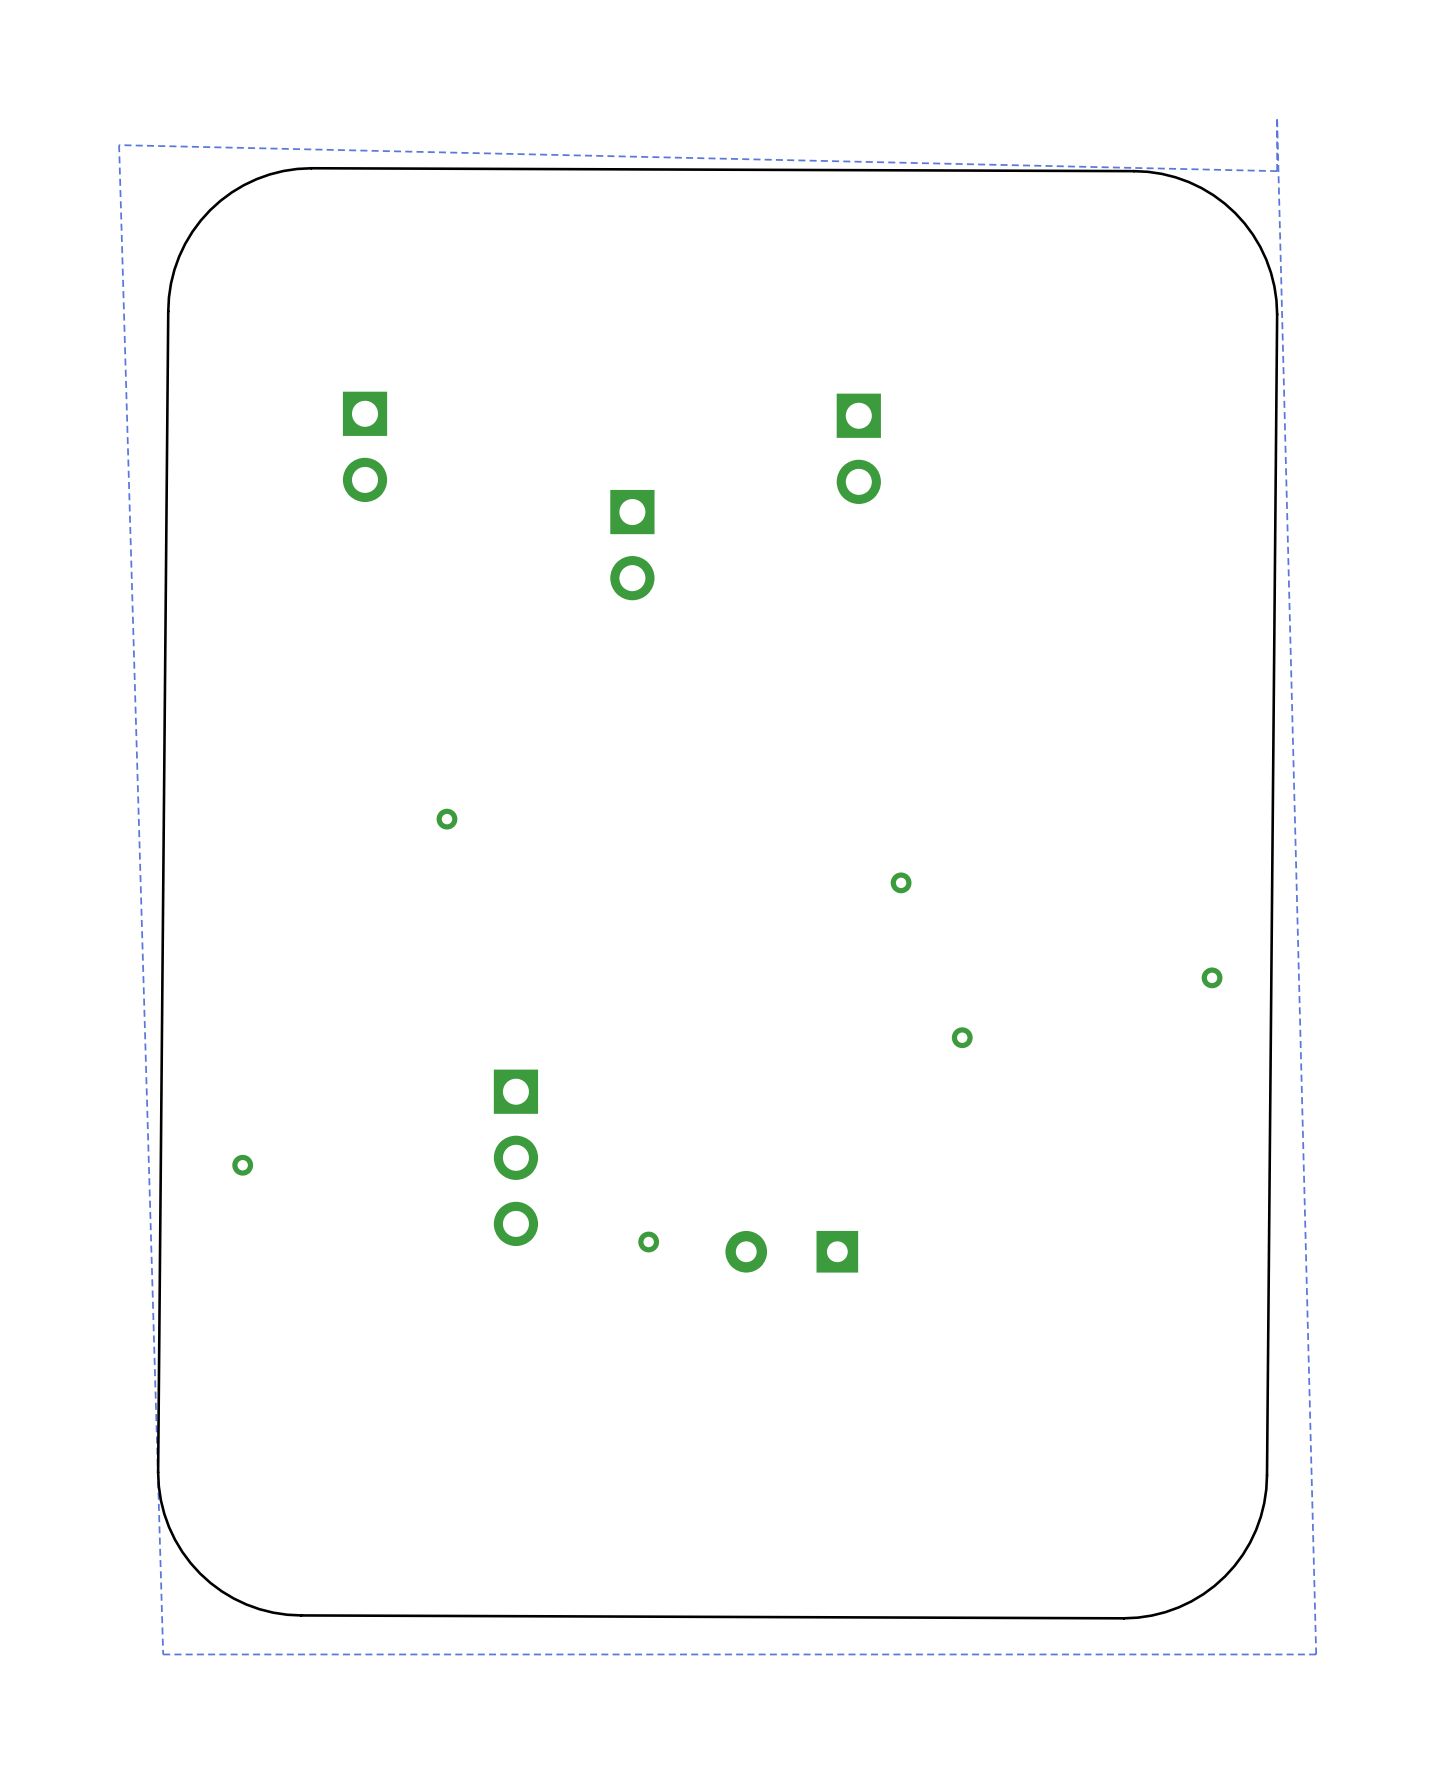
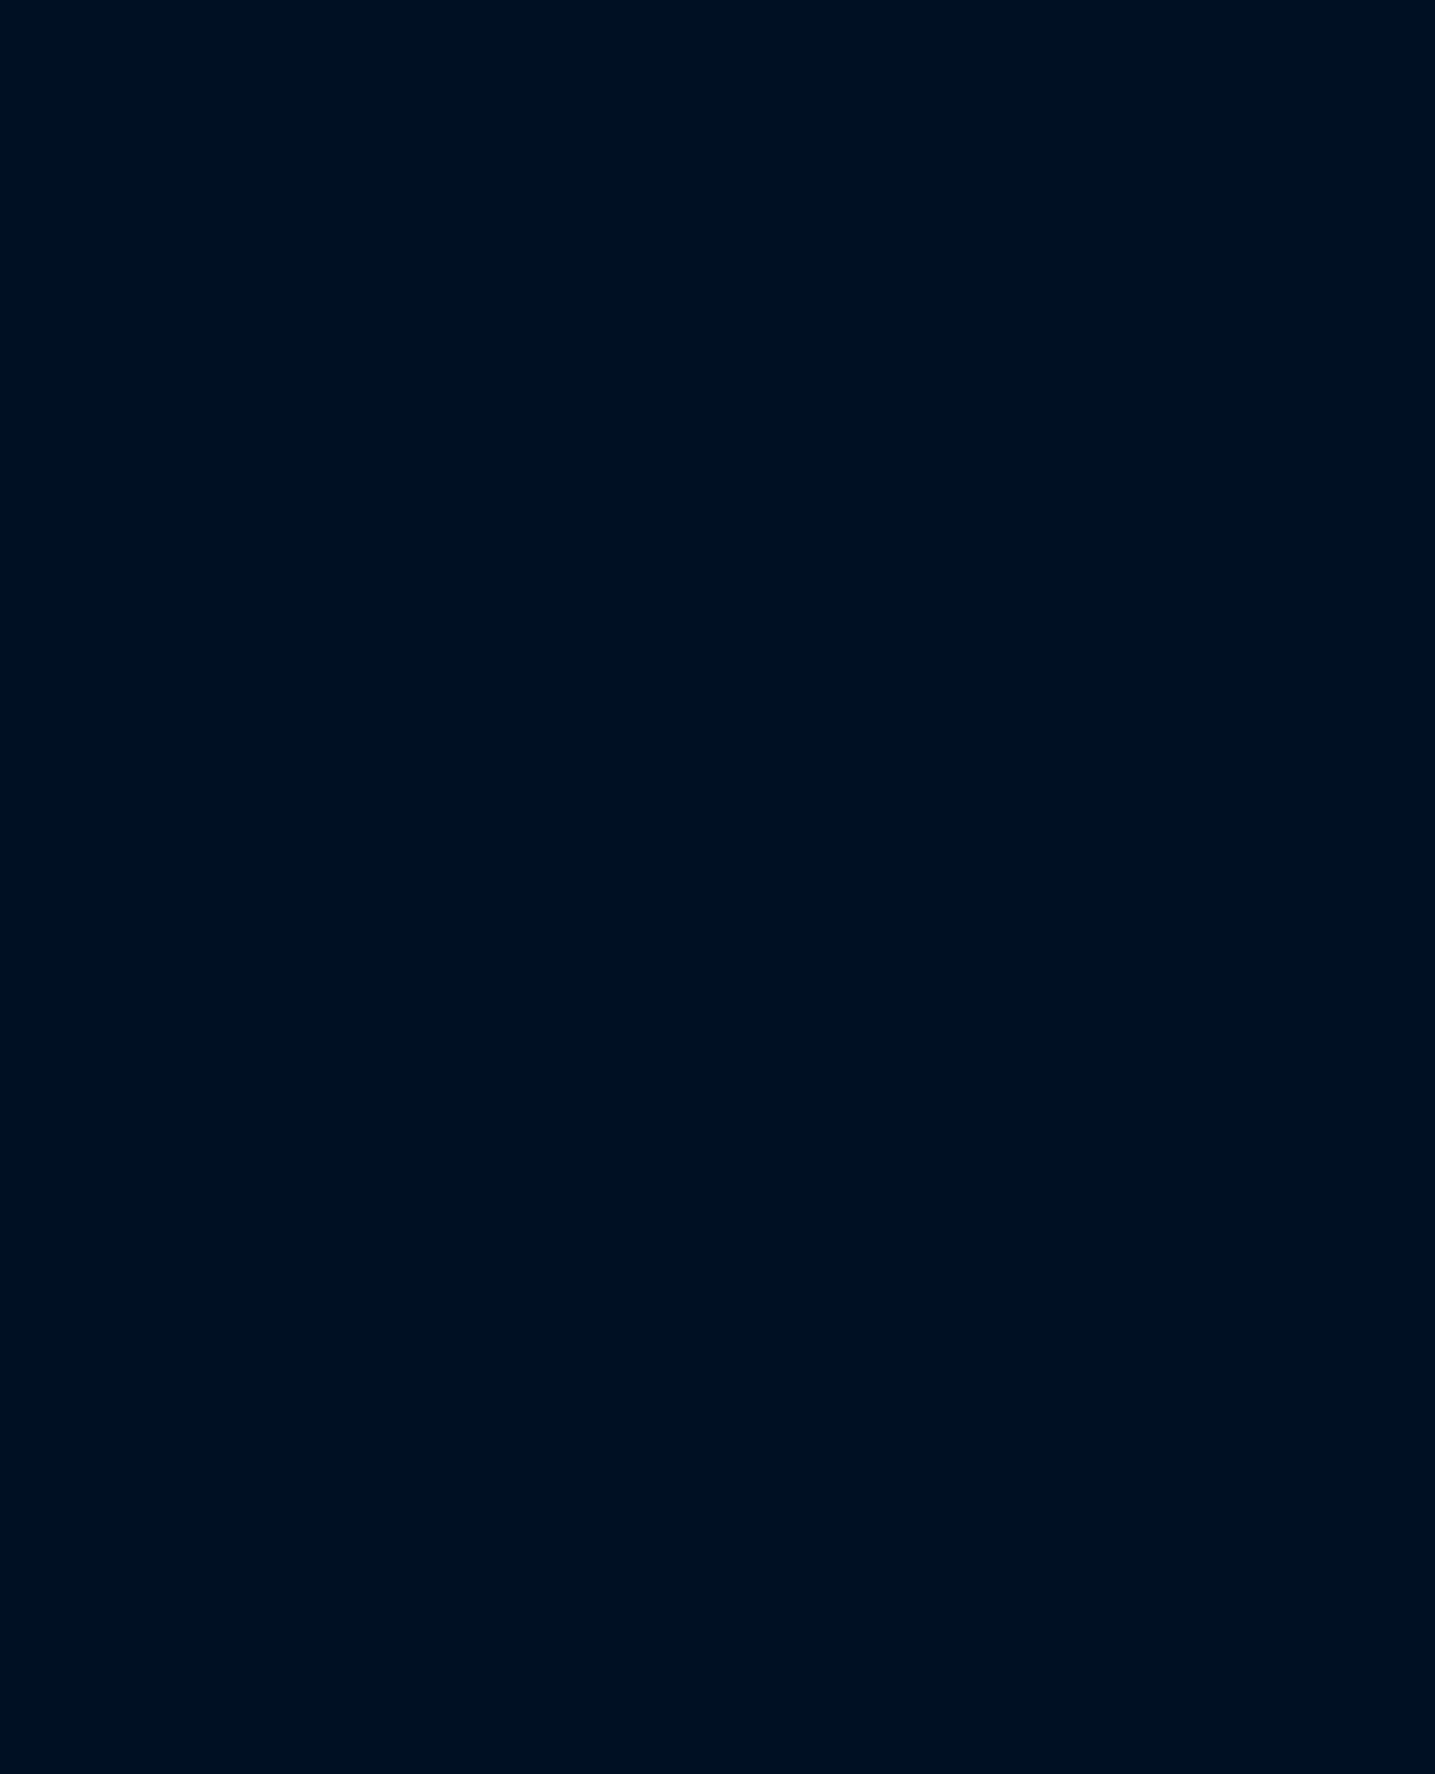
zone outline: (1277, 119) (1316, 1654) (163, 1654) (119, 145) (1277, 171) (1277, 119) -> none
board edge: (311, 168) (1148, 171) (1188, 182) (1213, 195) (1235, 213) (1253, 234) (1270, 272) (1277, 314) (1267, 1475) (1264, 1503) (1250, 1542) (1225, 1576) (1203, 1594) (1165, 1612) (1123, 1618) (301, 1615) (273, 1612) (233, 1598) (200, 1573) (182, 1551) (164, 1513) (158, 1472) (168, 297) (174, 269) (185, 243) (200, 220) (220, 200) (243, 185) (269, 174) (311, 168) -> none
part: (365, 446) -> none
part: (858, 448) -> none
part: (632, 545) -> none
via: (446, 819) -> none
via: (901, 882) -> none
via: (1212, 977) -> none
via: (962, 1037) -> none
part: (515, 1157) -> none
via: (242, 1165) -> none
via: (648, 1242) -> none
part: (791, 1251) -> none

